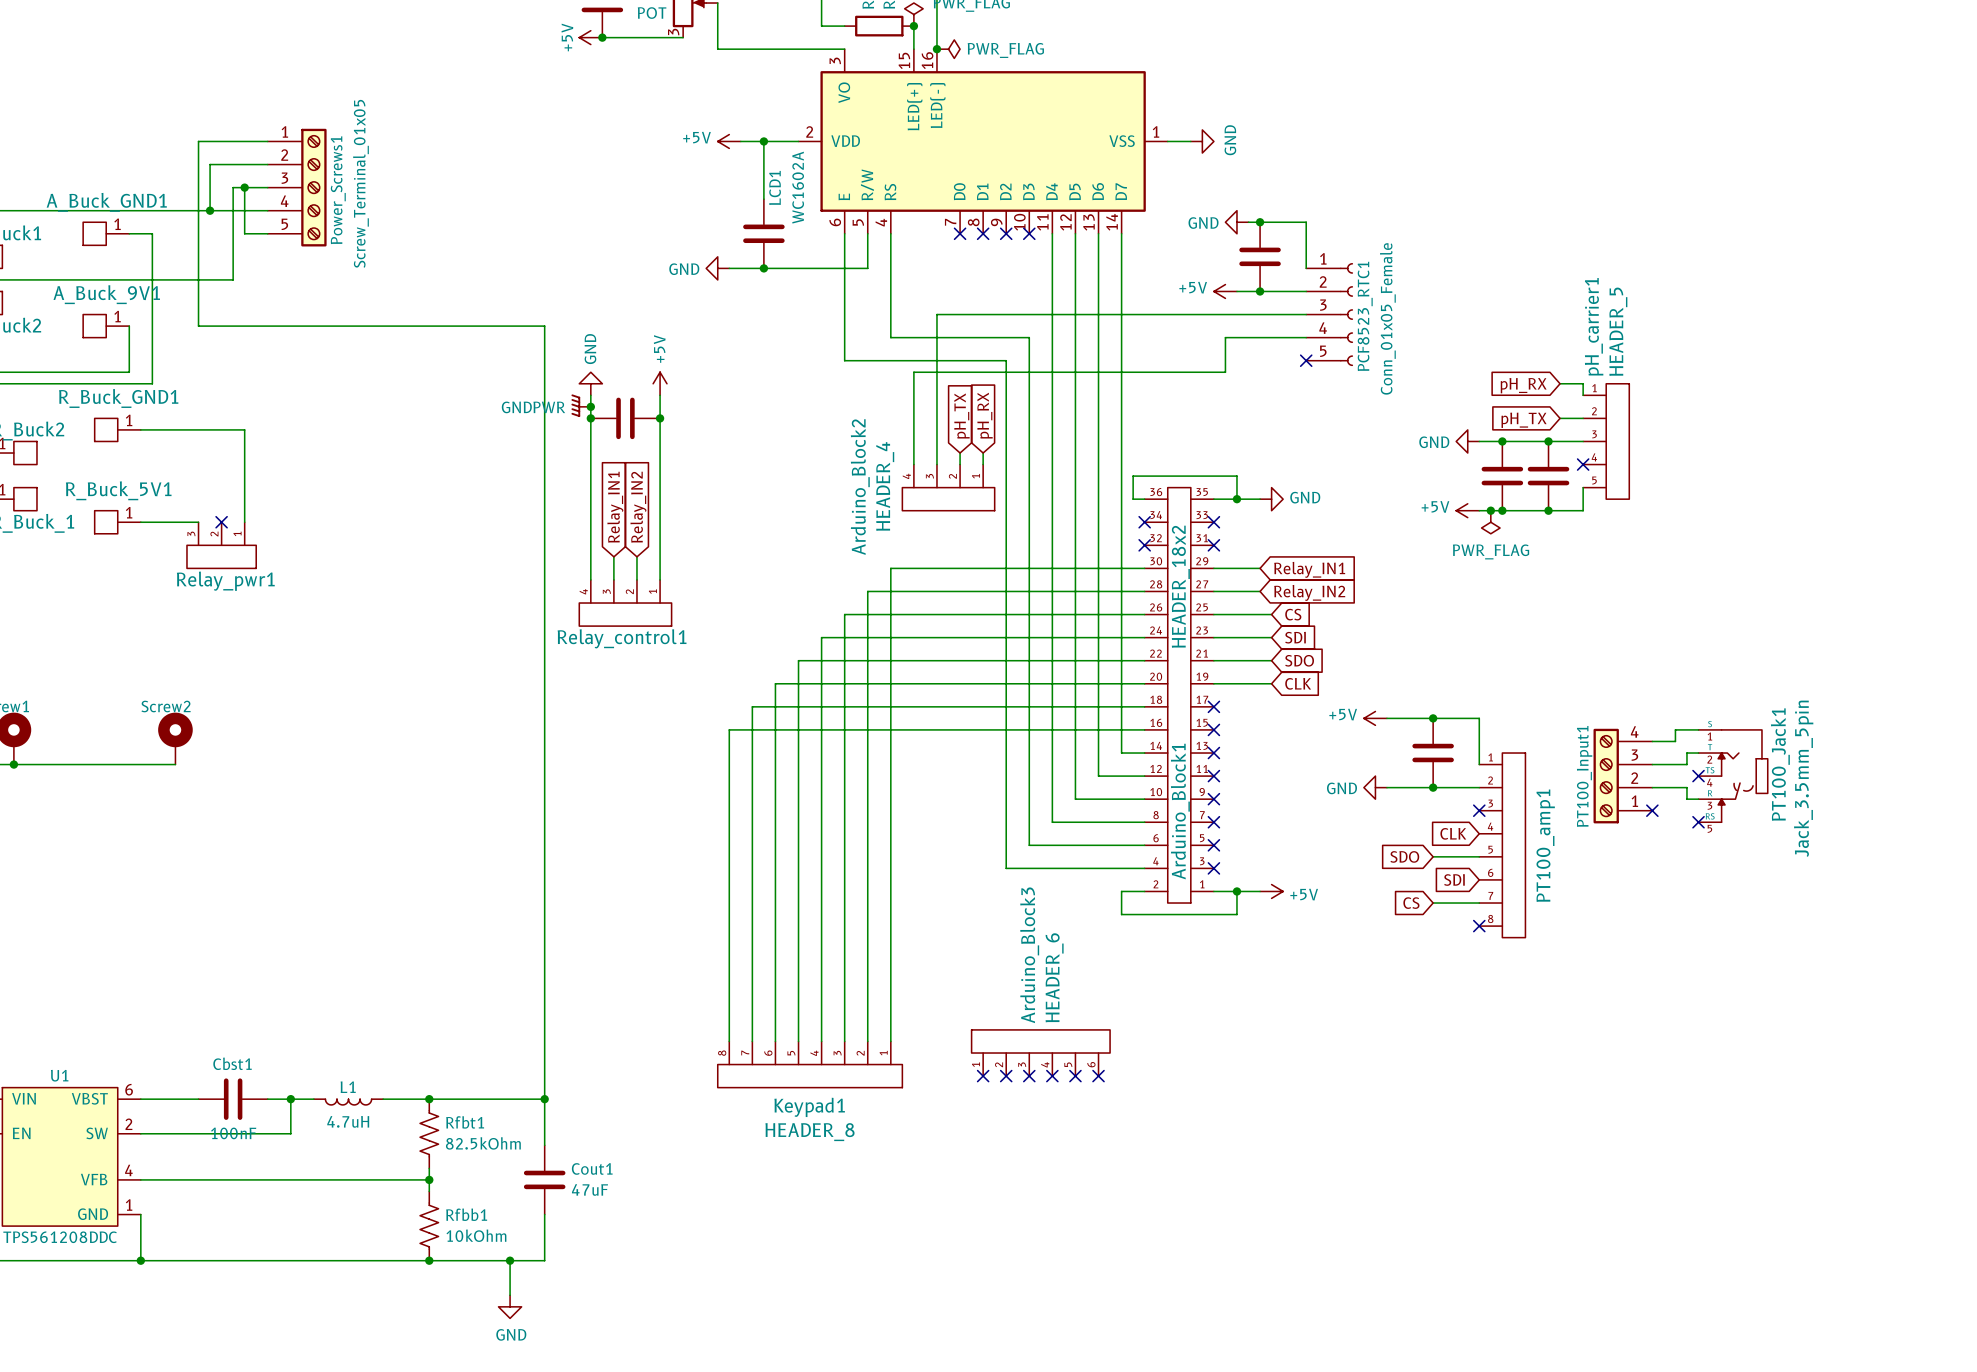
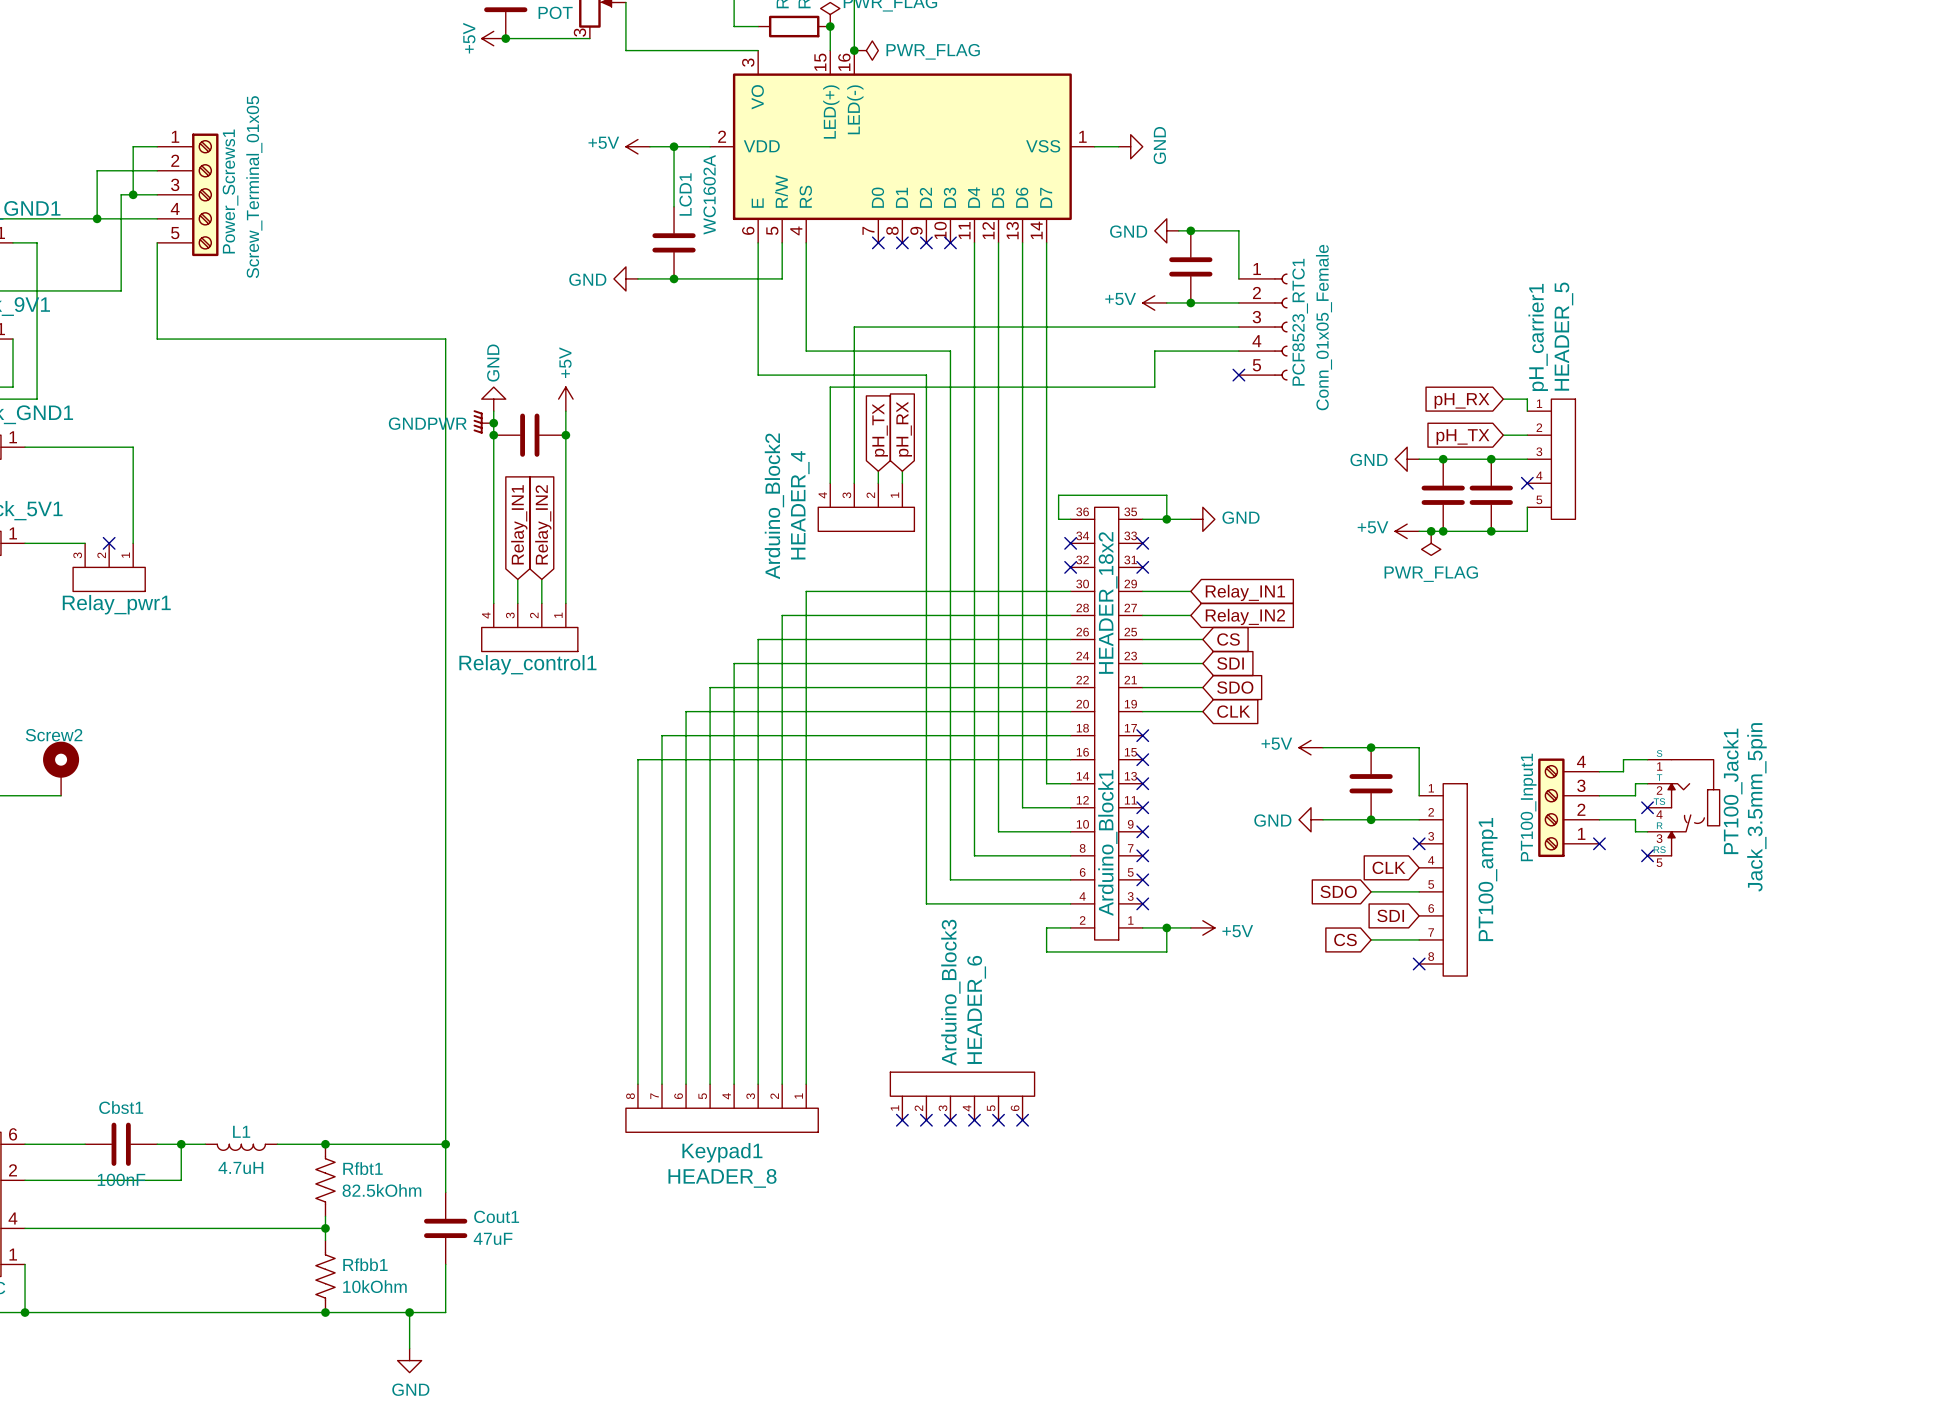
wire: (244, 141) (198, 141) (198, 326) (267, 326) -> (157, 242) (157, 339)
wire: (244, 187) (244, 233) (267, 233) -> (133, 194) (133, 146)

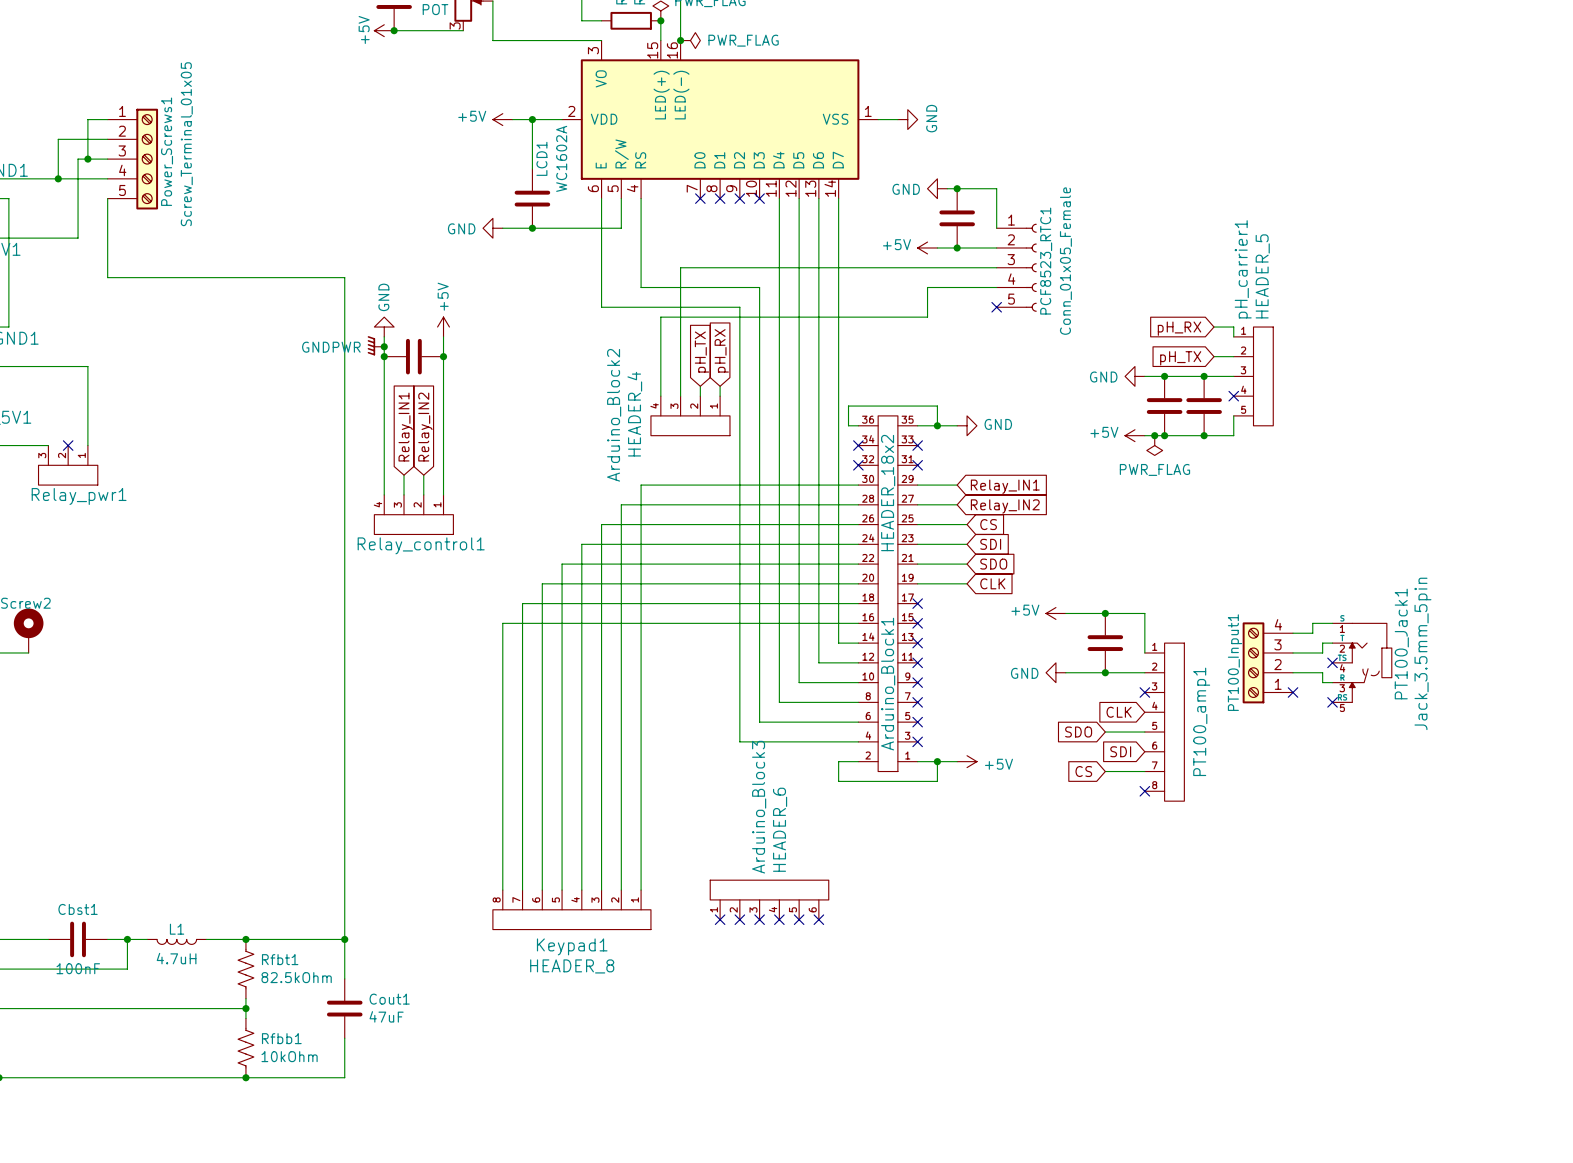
wire: (409, 1312) (409, 1348) -> none
junction: (409, 1312) -> none
power symbol: GND (409, 1360) -> none

